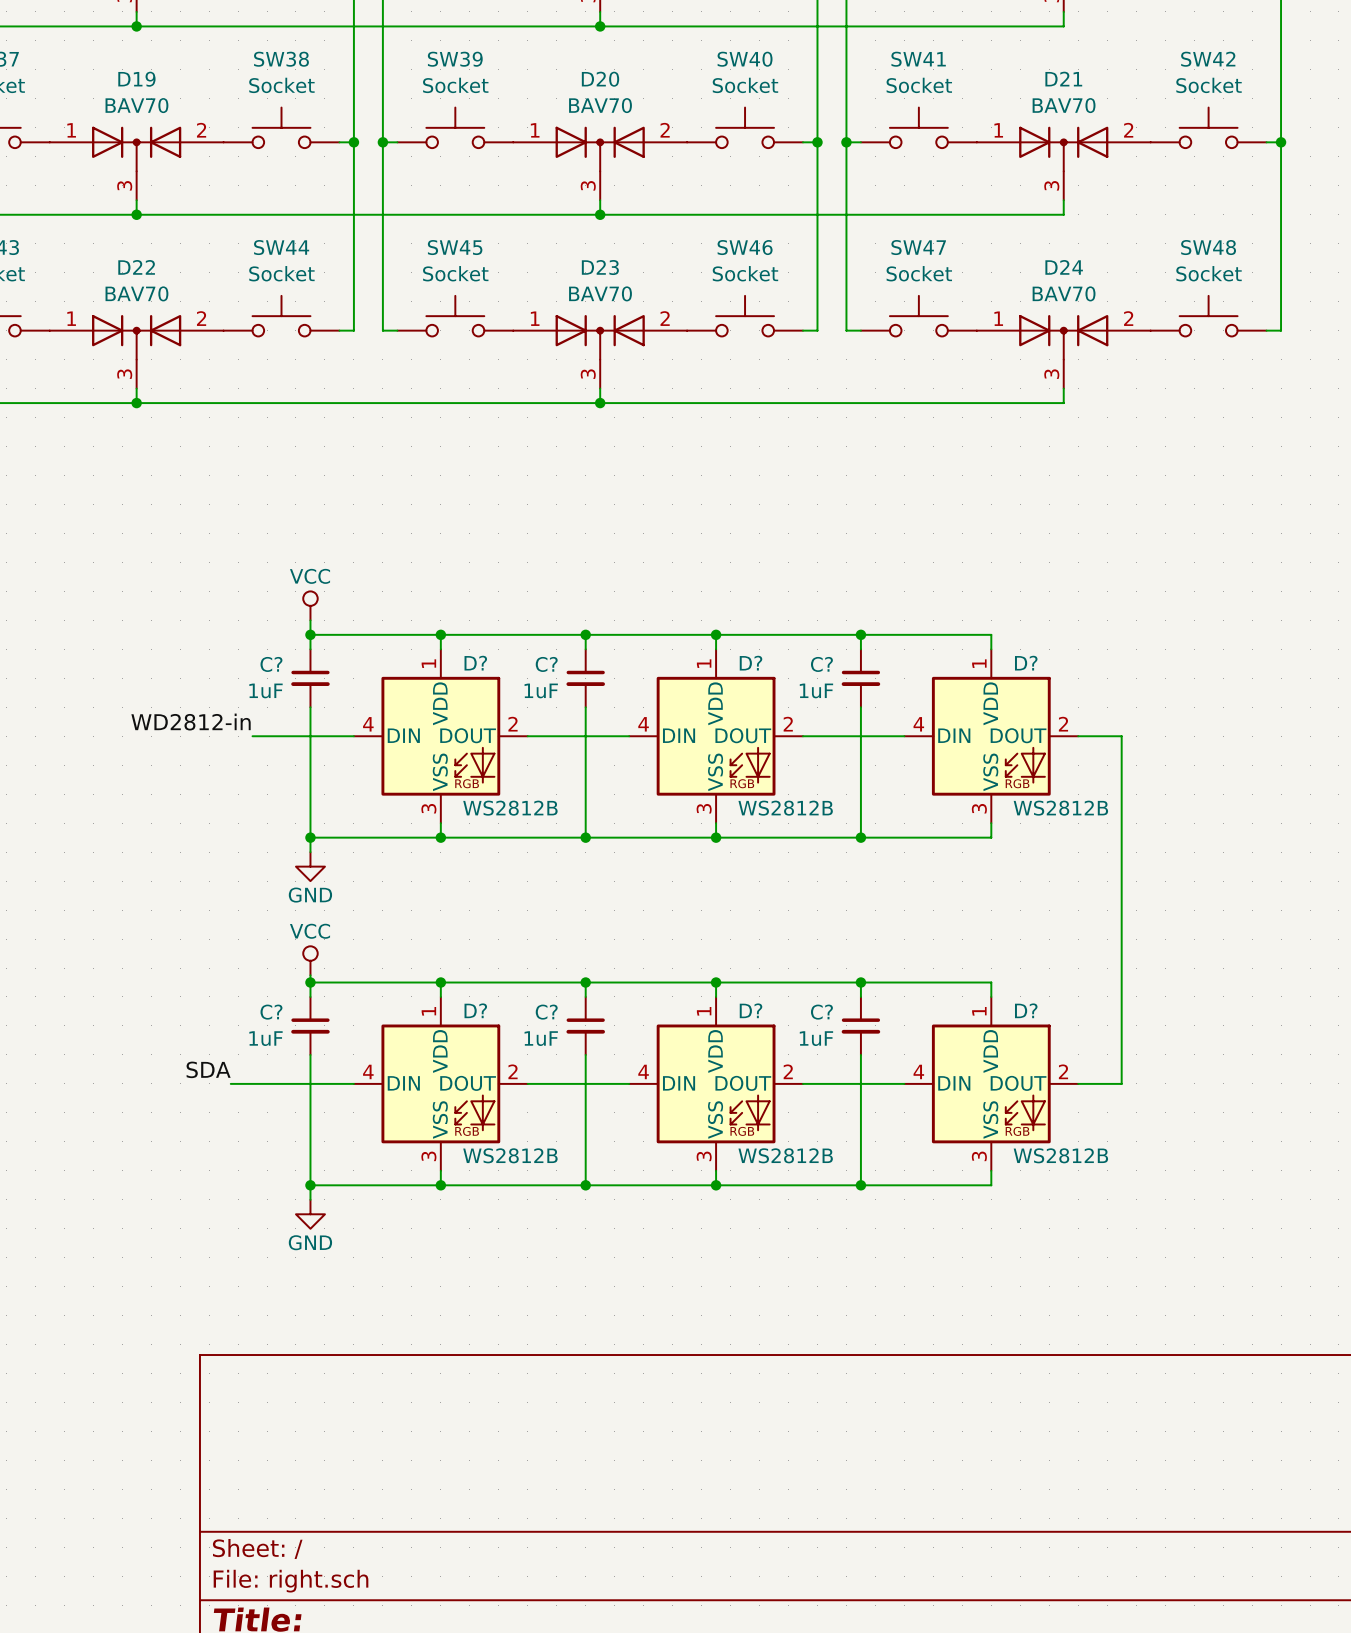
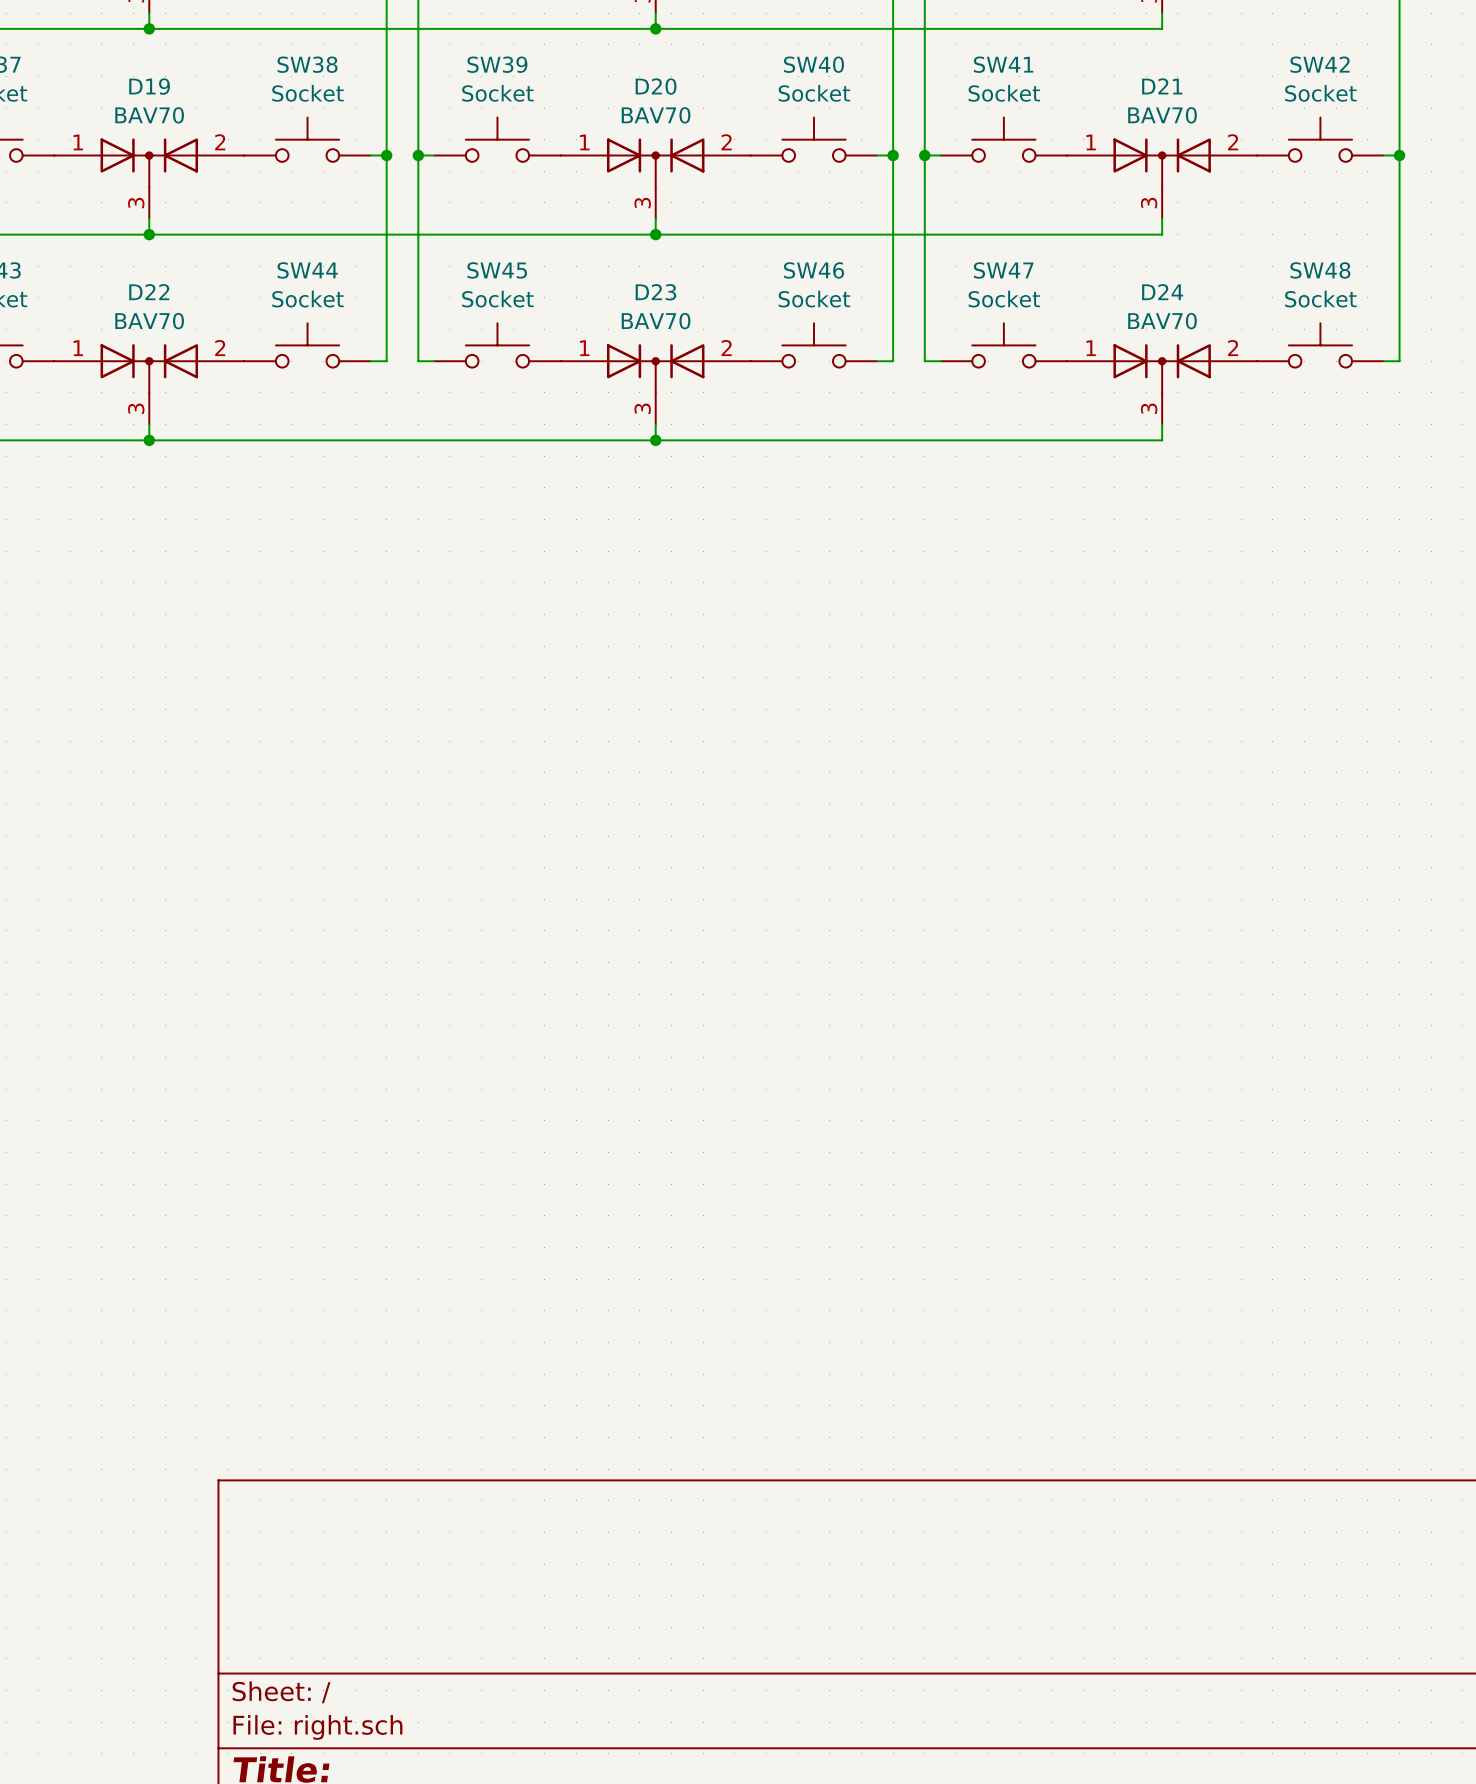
power symbol: VCC (310, 605) -> none
wire: (310, 620) (310, 649) -> none
wire: (310, 634) (991, 634) (991, 649) -> none
junction: (310, 634) -> none
wire: (440, 634) (440, 649) -> none
junction: (440, 634) -> none
wire: (585, 634) (585, 649) -> none
junction: (585, 634) -> none
wire: (716, 634) (716, 649) -> none
junction: (716, 634) -> none
wire: (860, 634) (860, 649) -> none
junction: (860, 634) -> none
C?: 1uF (310, 678) -> none
C?: 1uF (585, 678) -> none
C?: 1uF (860, 678) -> none
wire: (310, 707) (310, 852) -> none
wire: (585, 707) (585, 837) -> none
wire: (860, 707) (860, 837) -> none
label: WD2812-in (191, 722) -> none
wire: (252, 736) (353, 736) -> none
D?: WS2812B (440, 736) -> none
wire: (527, 736) (629, 736) -> none
D?: WS2812B (716, 736) -> none
wire: (802, 736) (904, 736) -> none
D?: WS2812B (991, 736) -> none
wire: (1078, 736) (1121, 736) (1121, 1083) (1078, 1083) -> none
wire: (440, 823) (440, 837) -> none
wire: (716, 823) (716, 837) -> none
wire: (991, 823) (991, 837) (310, 837) -> none
junction: (310, 837) -> none
junction: (440, 837) -> none
junction: (585, 837) -> none
junction: (716, 837) -> none
junction: (860, 837) -> none
power symbol: GND (310, 866) -> none
power symbol: VCC (310, 960) -> none
wire: (310, 975) (310, 996) -> none
wire: (310, 982) (991, 982) (991, 996) -> none
junction: (310, 982) -> none
wire: (440, 982) (440, 996) -> none
junction: (440, 982) -> none
wire: (585, 982) (585, 996) -> none
junction: (585, 982) -> none
wire: (716, 982) (716, 996) -> none
junction: (716, 982) -> none
wire: (860, 982) (860, 996) -> none
junction: (860, 982) -> none
C?: 1uF (310, 1025) -> none
C?: 1uF (585, 1025) -> none
C?: 1uF (860, 1025) -> none
wire: (310, 1054) (310, 1199) -> none
wire: (585, 1054) (585, 1185) -> none
wire: (860, 1054) (860, 1185) -> none
label: SDA (208, 1069) -> none
wire: (230, 1083) (353, 1083) -> none
D?: WS2812B (440, 1083) -> none
wire: (527, 1083) (629, 1083) -> none
D?: WS2812B (716, 1083) -> none
wire: (802, 1083) (904, 1083) -> none
D?: WS2812B (991, 1083) -> none
wire: (440, 1170) (440, 1185) -> none
wire: (716, 1170) (716, 1185) -> none
wire: (991, 1170) (991, 1185) (310, 1185) -> none
junction: (310, 1185) -> none
junction: (440, 1185) -> none
junction: (585, 1185) -> none
junction: (716, 1185) -> none
junction: (860, 1185) -> none
power symbol: GND (310, 1214) -> none

